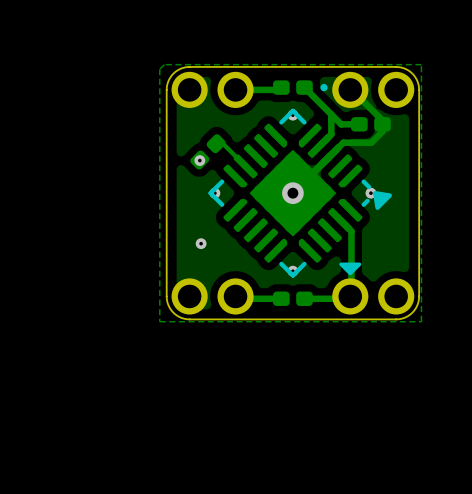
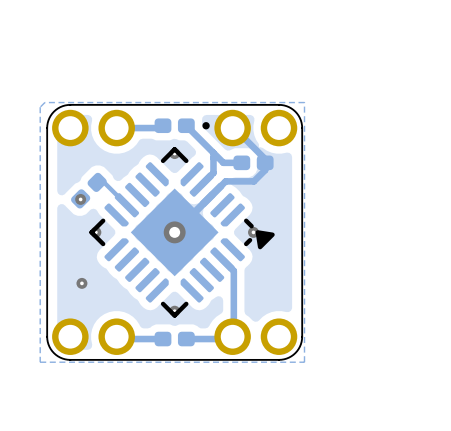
drawing: [339, 262, 362, 276] -> none

